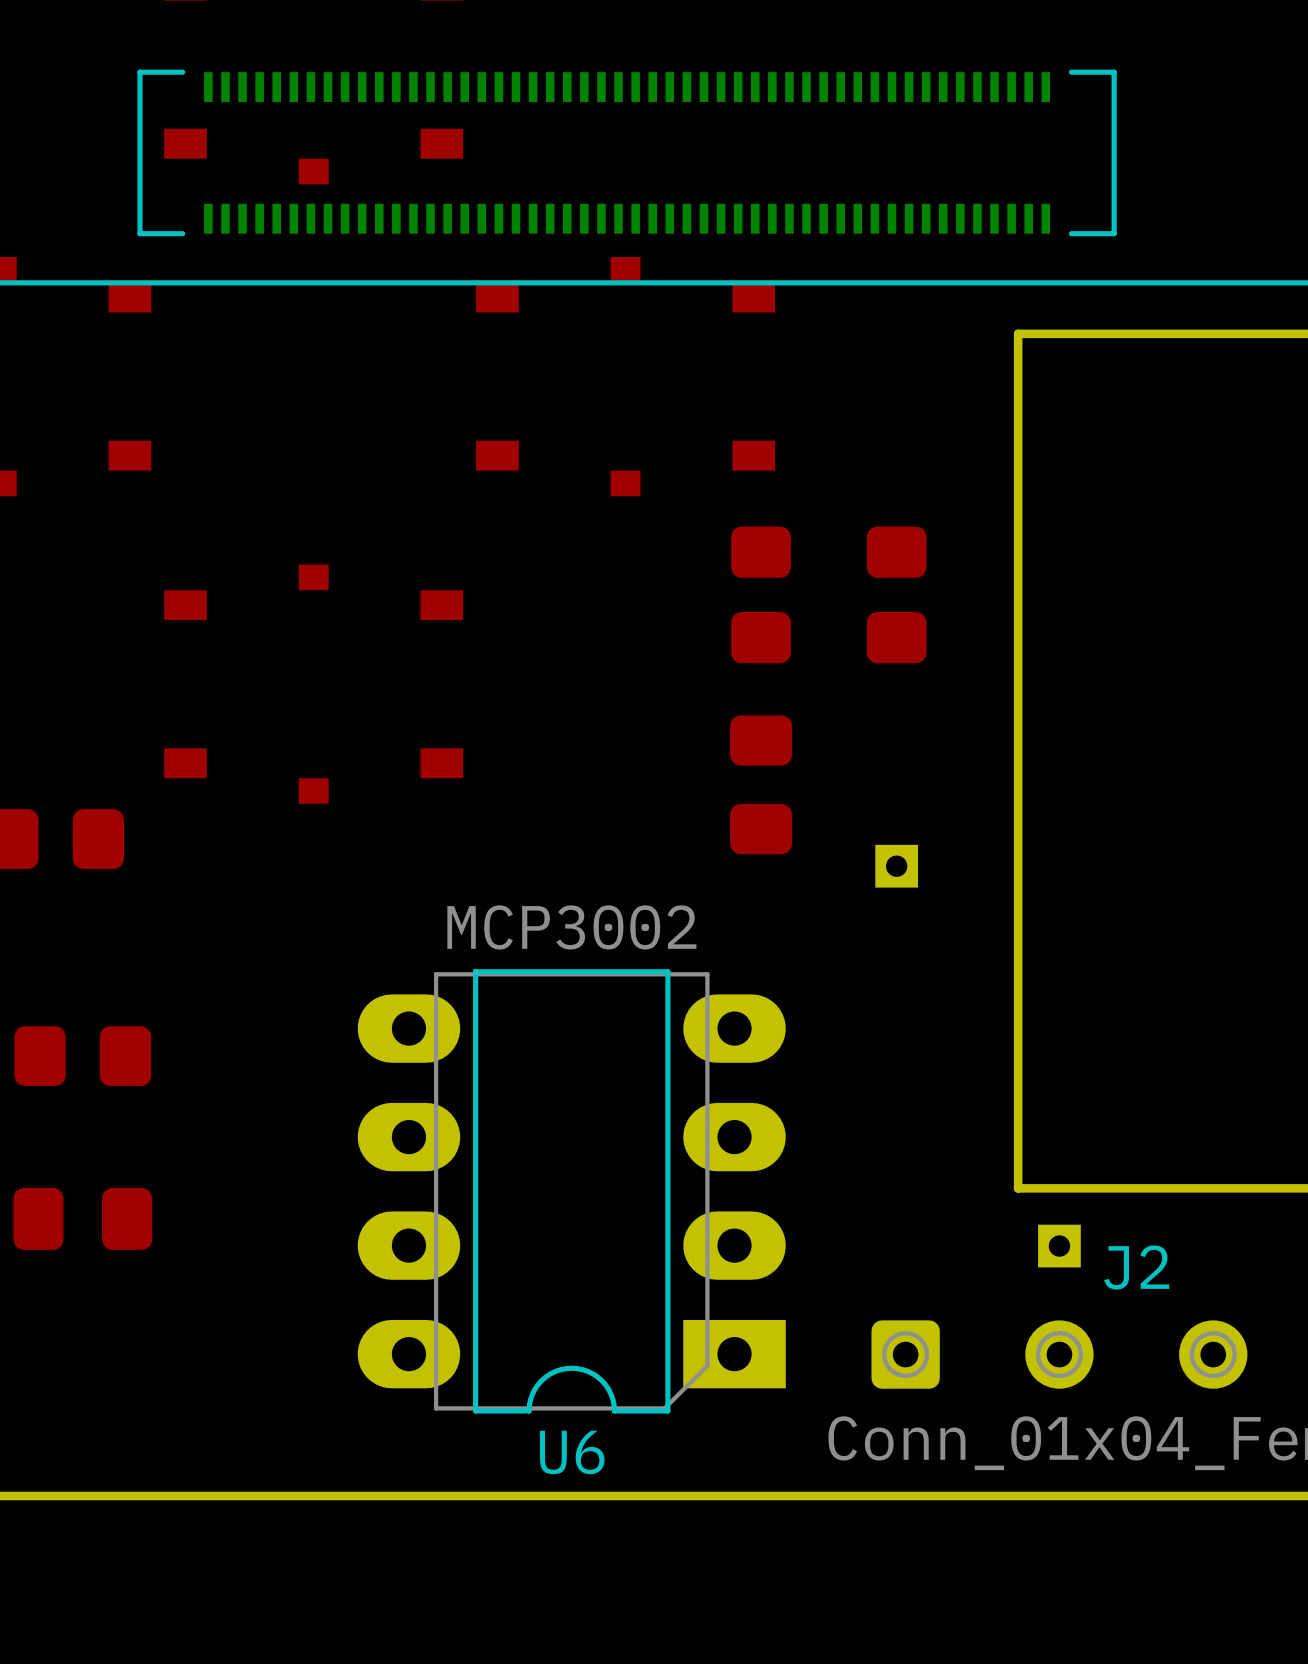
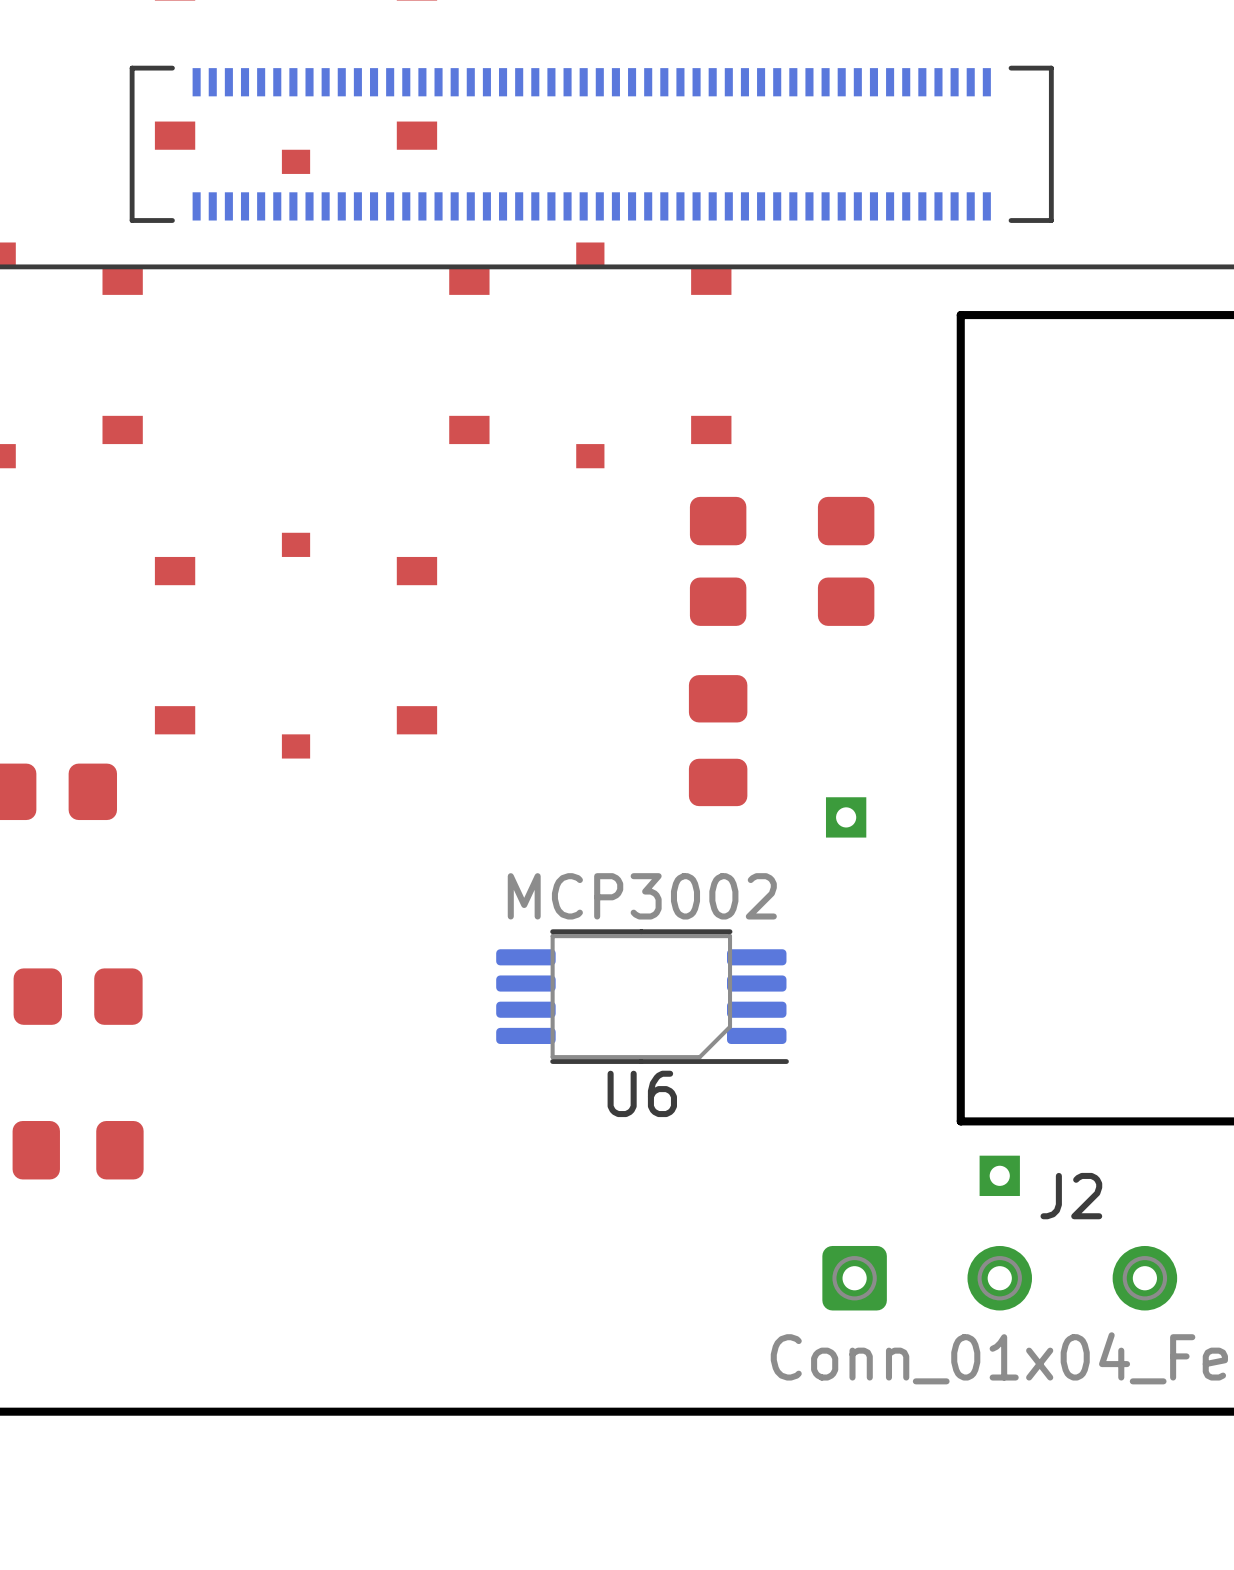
U6 value position: MCP3002 (571, 927) -> MCP3002 (642, 896)
U6 footprint: [357, 969, 786, 1414] -> [496, 929, 789, 1064]
U6 name position: U6 (572, 1452) -> U6 (642, 1093)

